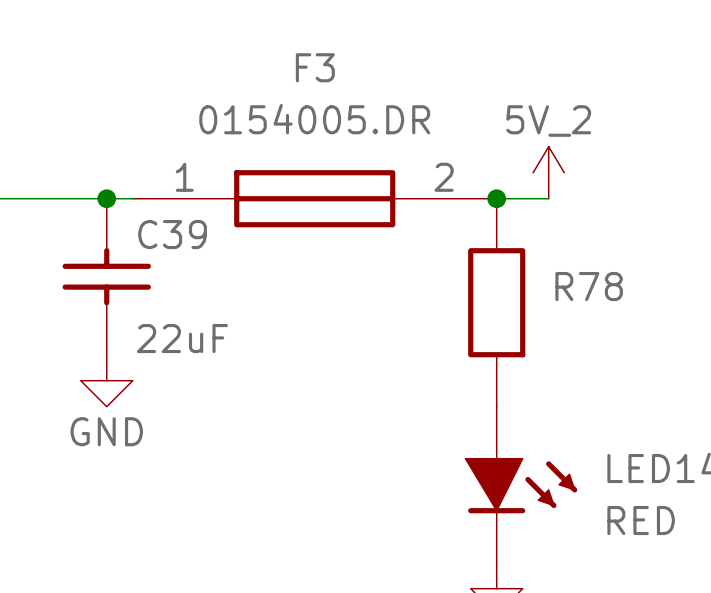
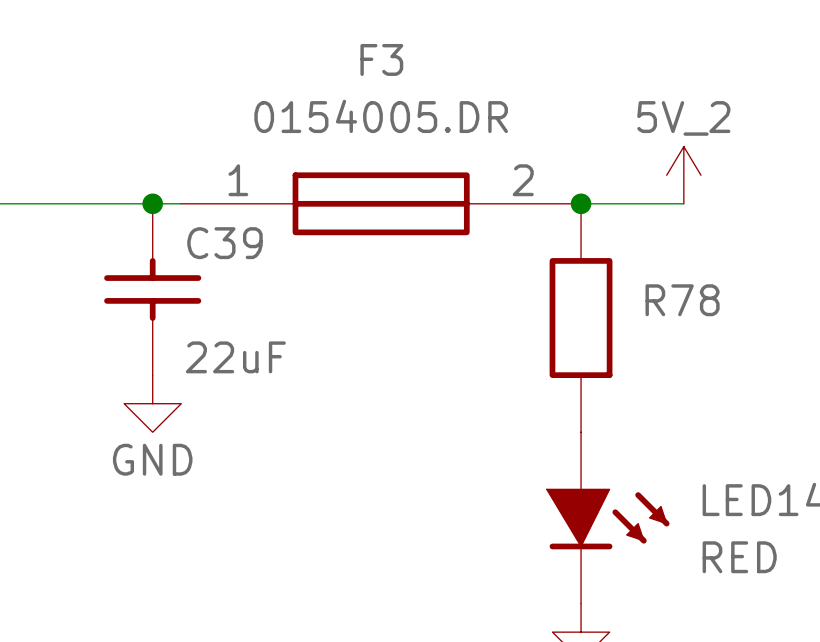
power symbol position: 5V_2 (548, 172) -> 5V_2 (683, 175)
wire: none -> (638, 203) (683, 203)

